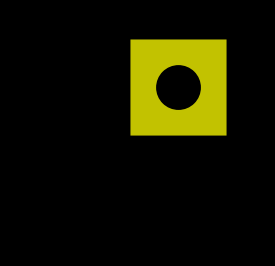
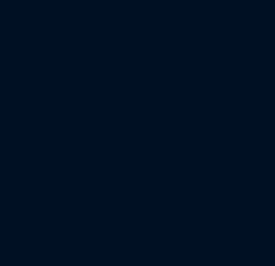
part: (178, 87) -> none

